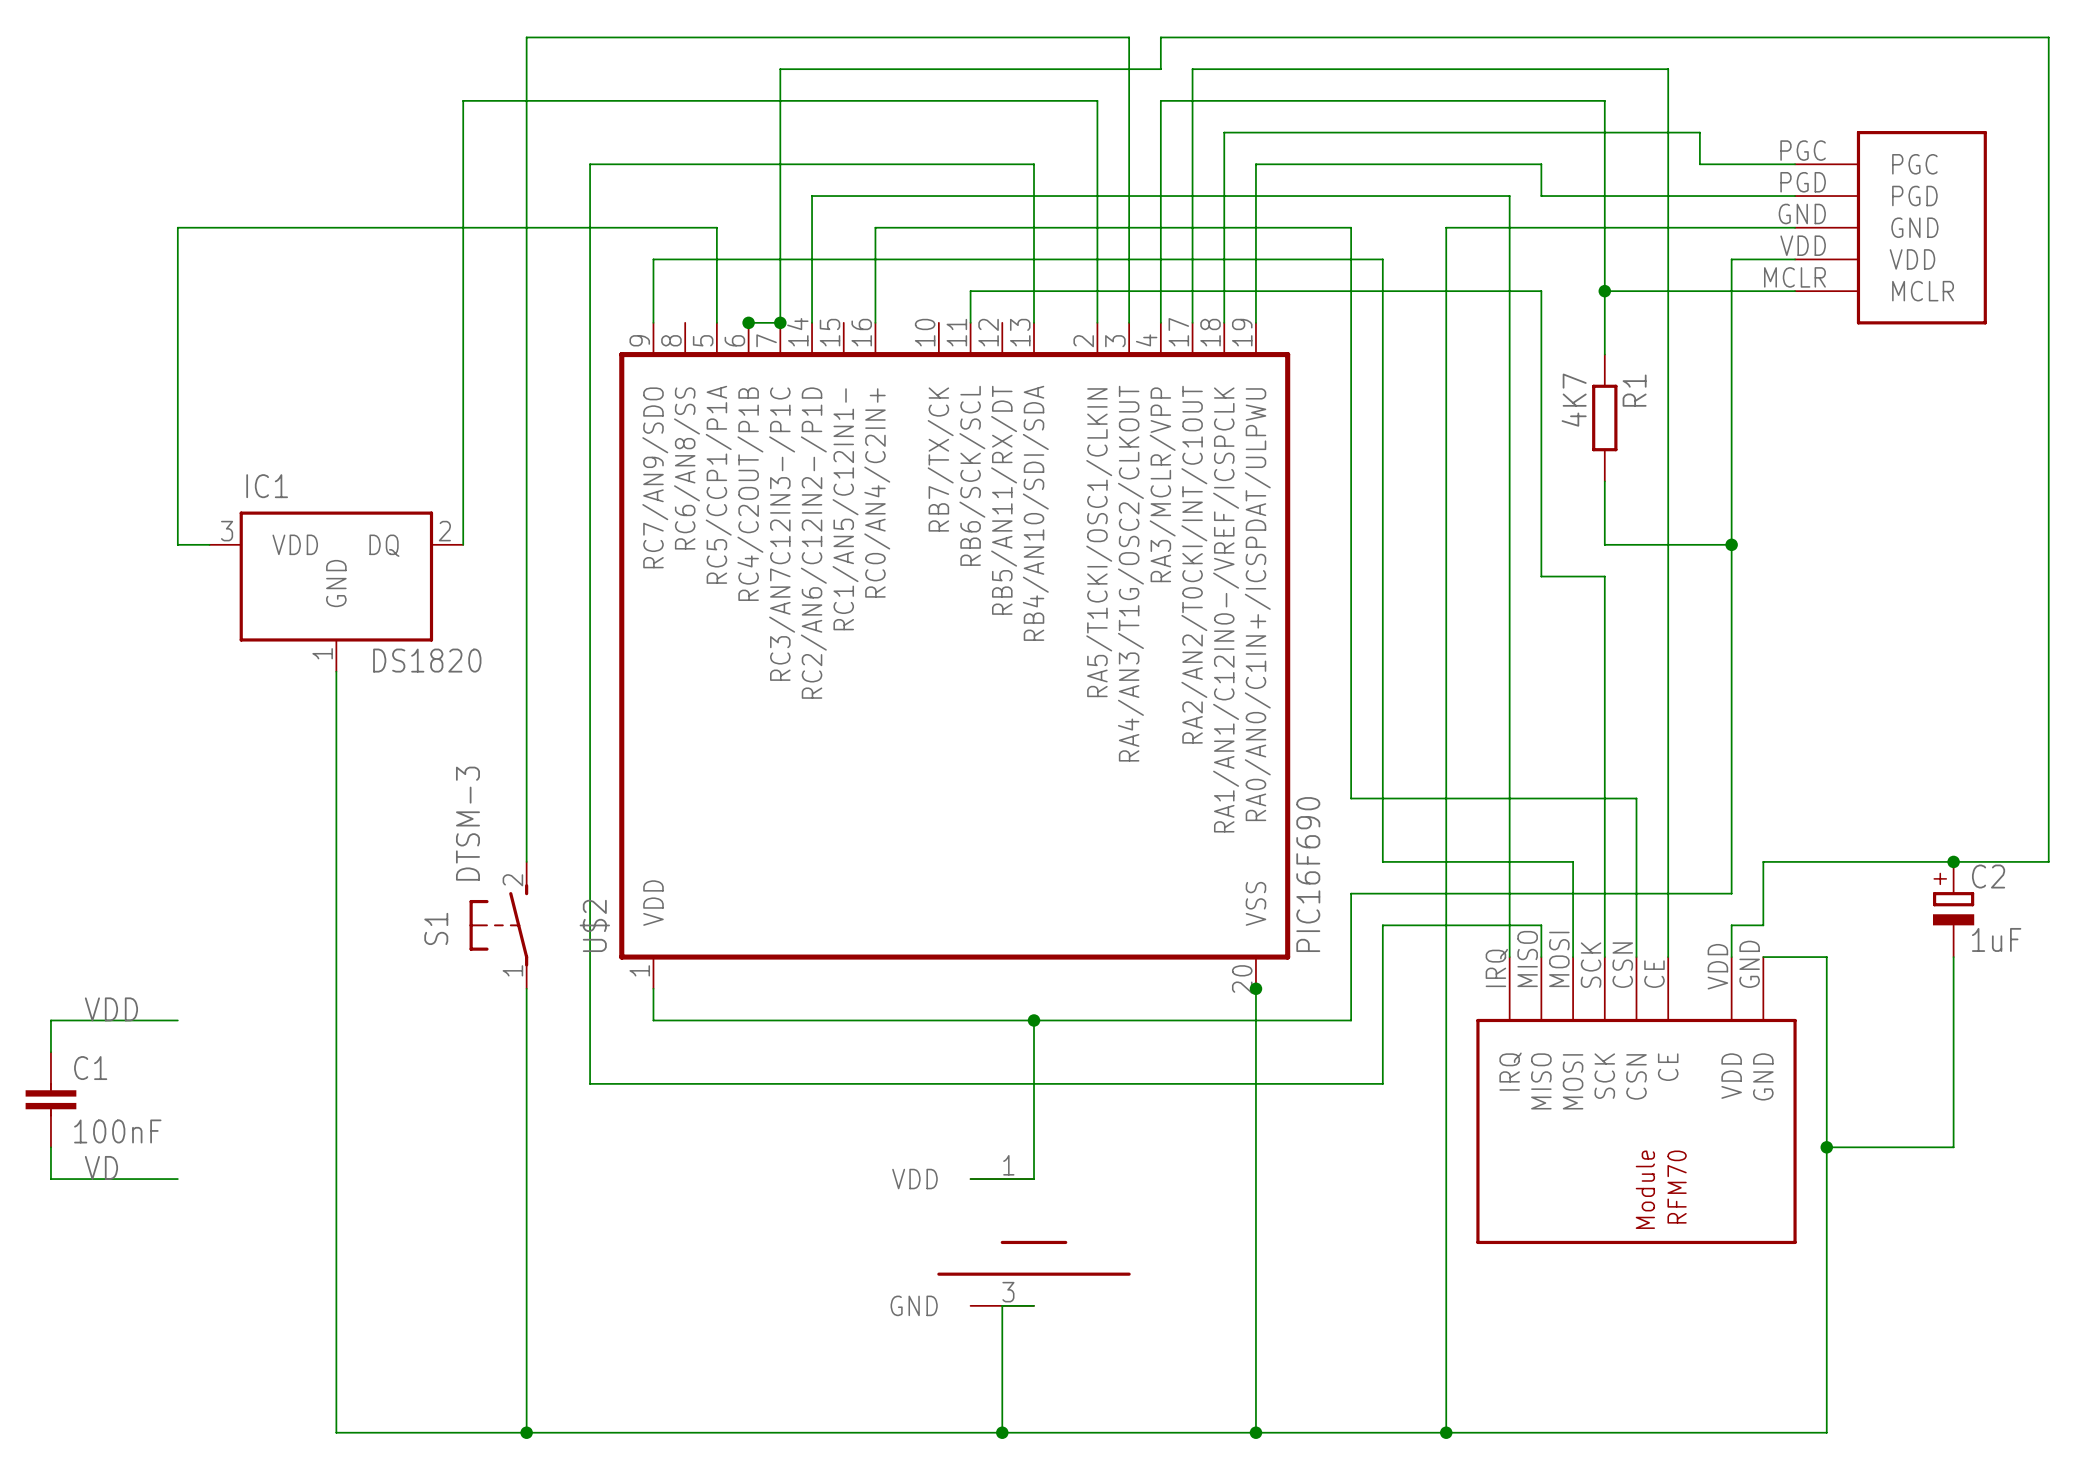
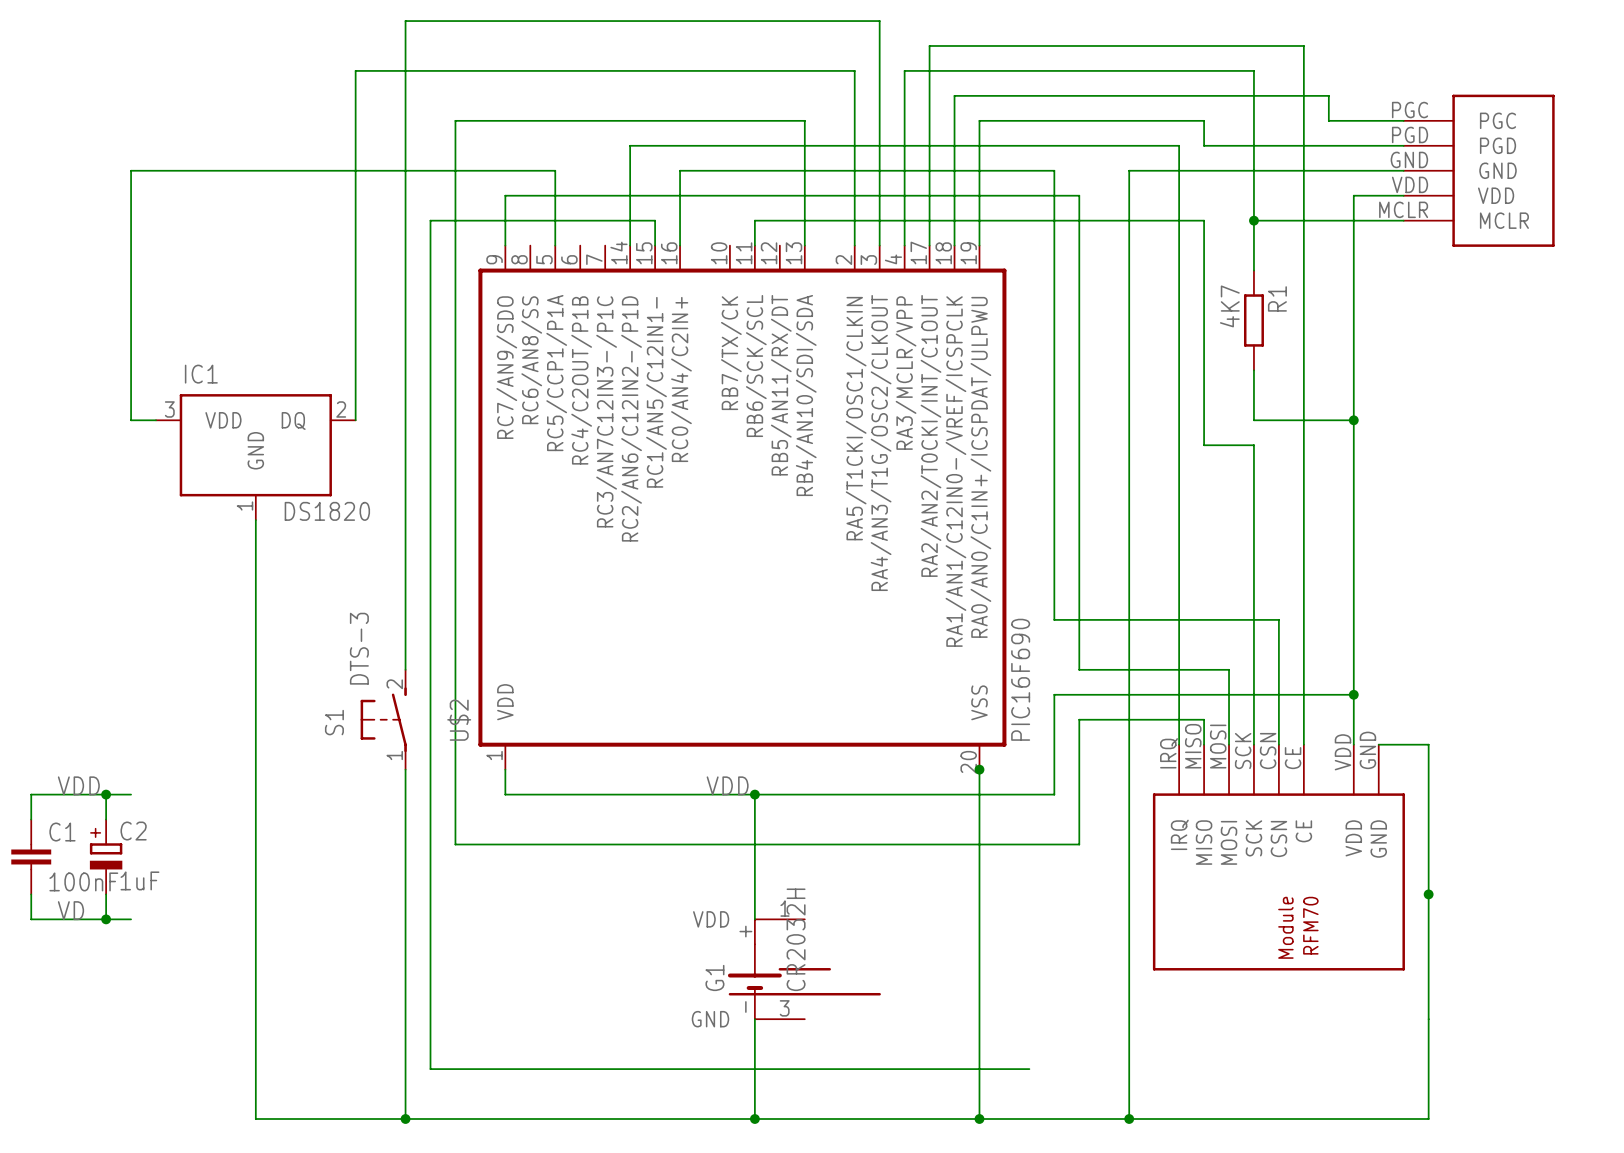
wire: (748, 322) (780, 322) (780, 69) (1160, 69) (1160, 37) (2048, 37) (2048, 861) (1763, 861) (1763, 925) (1731, 925) -> (1353, 694) (1353, 719)
junction: (748, 322) -> none
junction: (780, 322) -> none
wire: none -> (655, 245) (655, 220) (430, 220) (430, 1069) (1029, 1069)
S1 value: DTSM-3 (467, 823) -> DTS-3 (359, 648)
junction: (1953, 861) -> none
junction: none -> (1353, 694)
C2 position: (1953, 909) -> (106, 856)
wire: (1953, 957) (1953, 1147) (1826, 1147) -> none
label: none -> VDD (727, 785)
wire: none -> (106, 794) (106, 819)
junction: none -> (106, 794)
wire: (1034, 1020) (1034, 1179) (970, 1179) -> (754, 794) (754, 919)
junction position: (1034, 1020) -> (754, 794)
wire: none -> (106, 894) (106, 919)
junction: none -> (106, 919)
G1: none -> CR2032H (754, 969)
wire: none -> (754, 1019) (754, 1118)
wire: (1034, 1305) (1002, 1305) (1002, 1432) -> none
junction position: (1002, 1432) -> (754, 1118)

